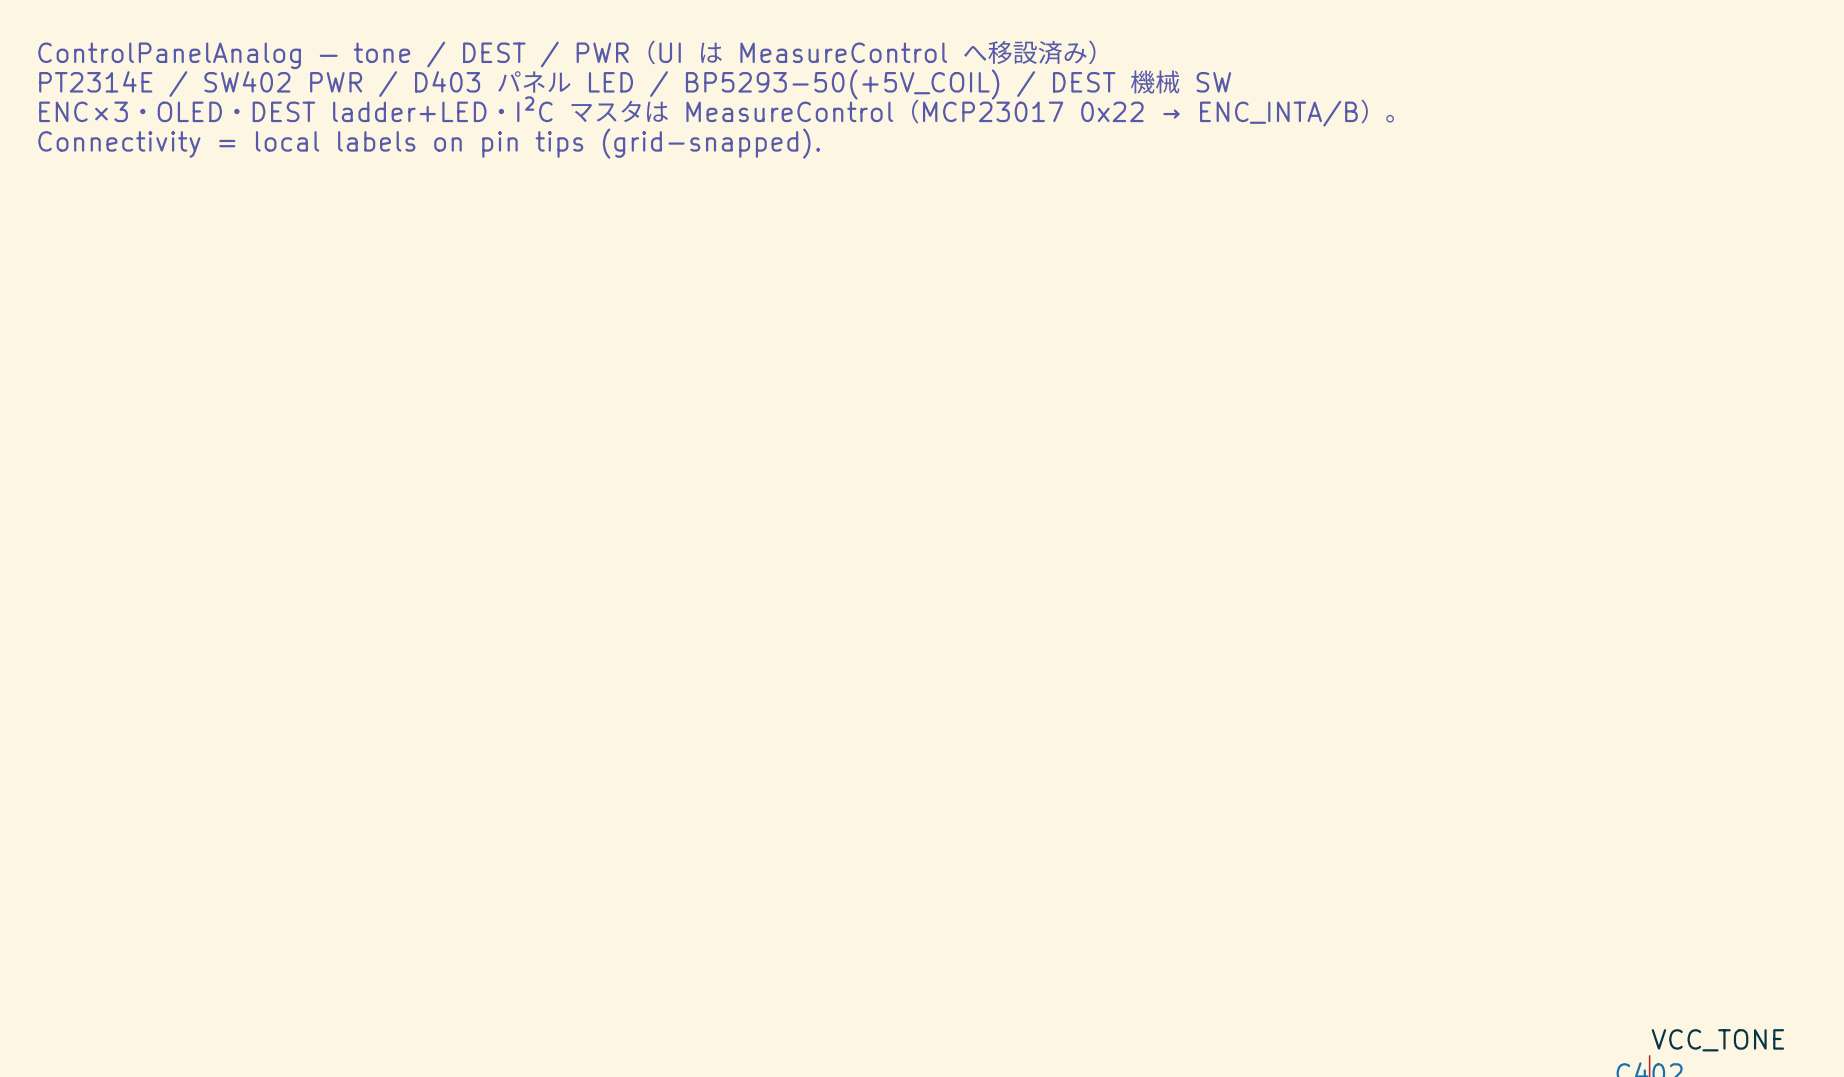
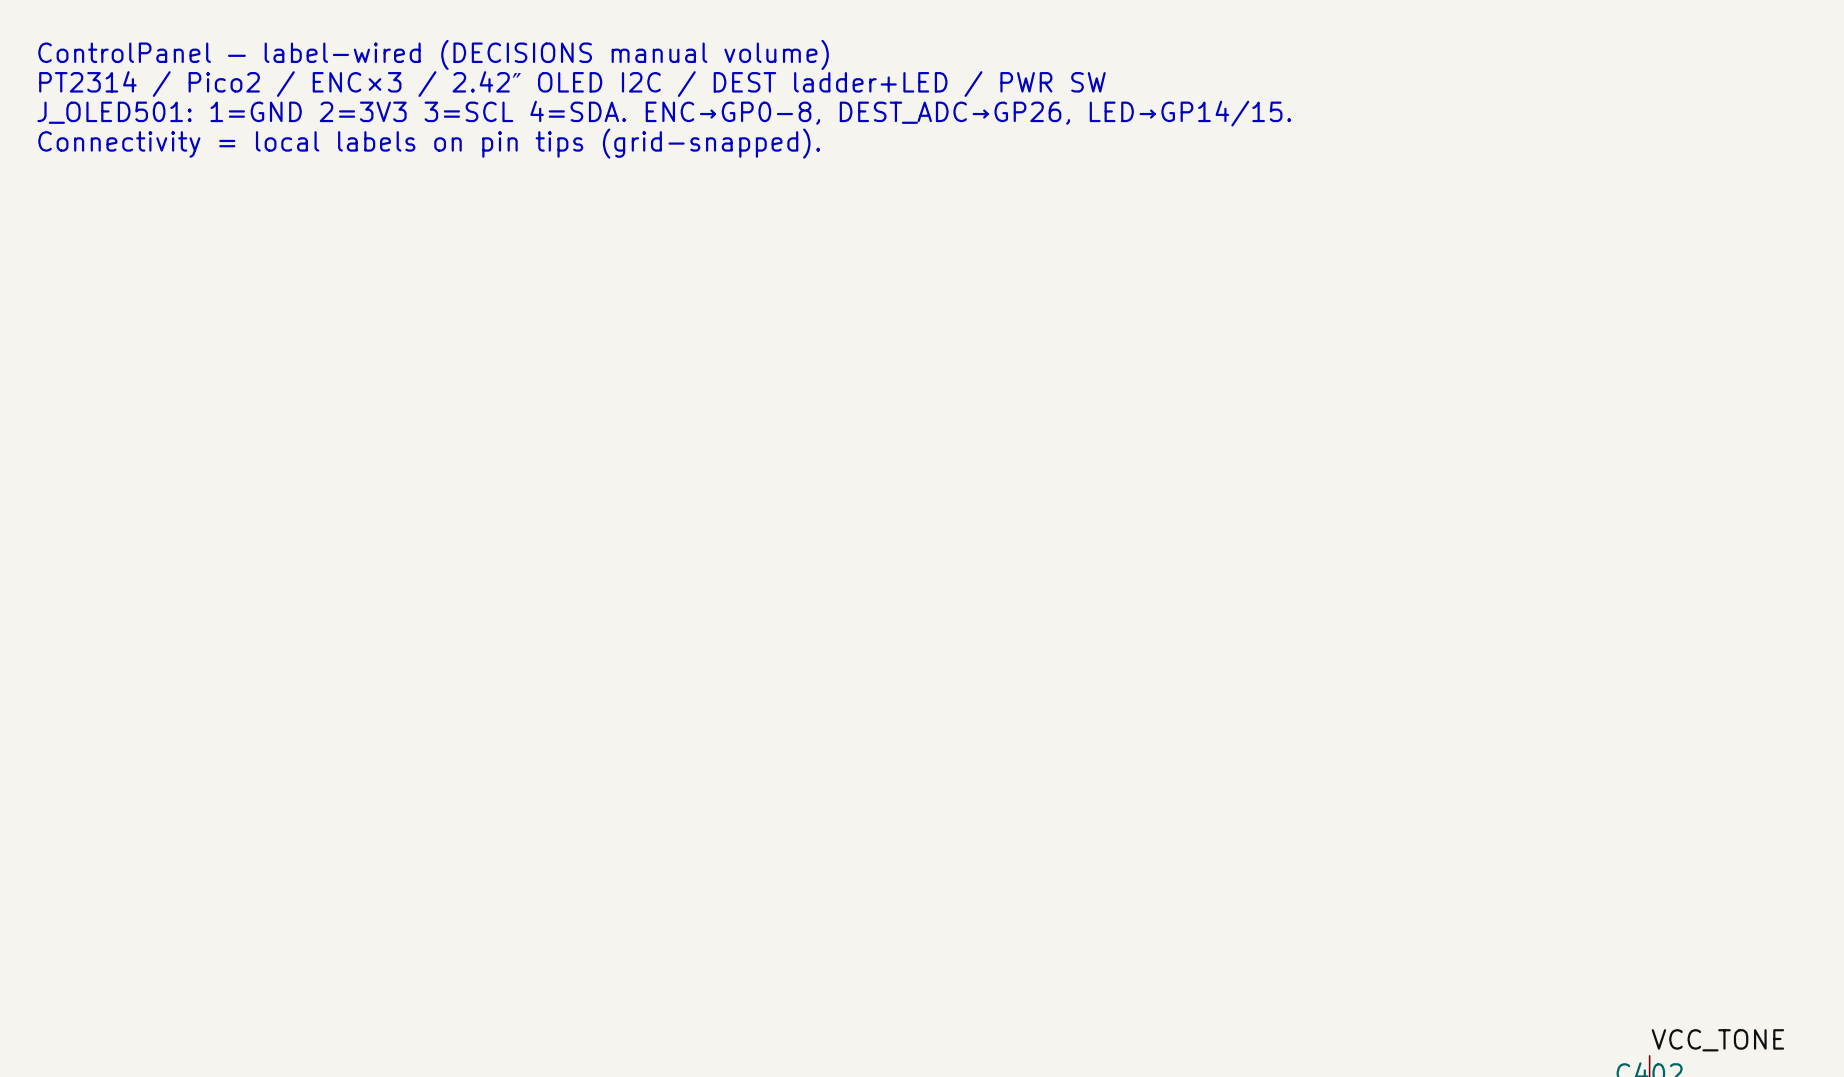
text: ControlPanelAnalog — tone / DEST / PWR（UI は MeasureControl へ移設済み） (567, 54) -> ControlPanel — label-wired (DECISIONS manual volume) (433, 54)
text: PT2314E / SW402 PWR / D403 パネル LED / BP5293-50(+5V_COIL) / DEST 機械 SW (635, 84) -> PT2314 / Pico2 / ENC×3 / 2.42″ OLED I2C / DEST ladder+LED / PWR SW (572, 84)
text: ENC×3・OLED・DEST ladder+LED・I²C マスタは MeasureControl（MCP23017 0x22 → ENC_INTA/B）。 (717, 111) -> J_OLED501: 1=GND 2=3V3 3=SCL 4=SDA. ENC→GP0-8, DEST_ADC→GP26, LED→GP14/15. (664, 113)

